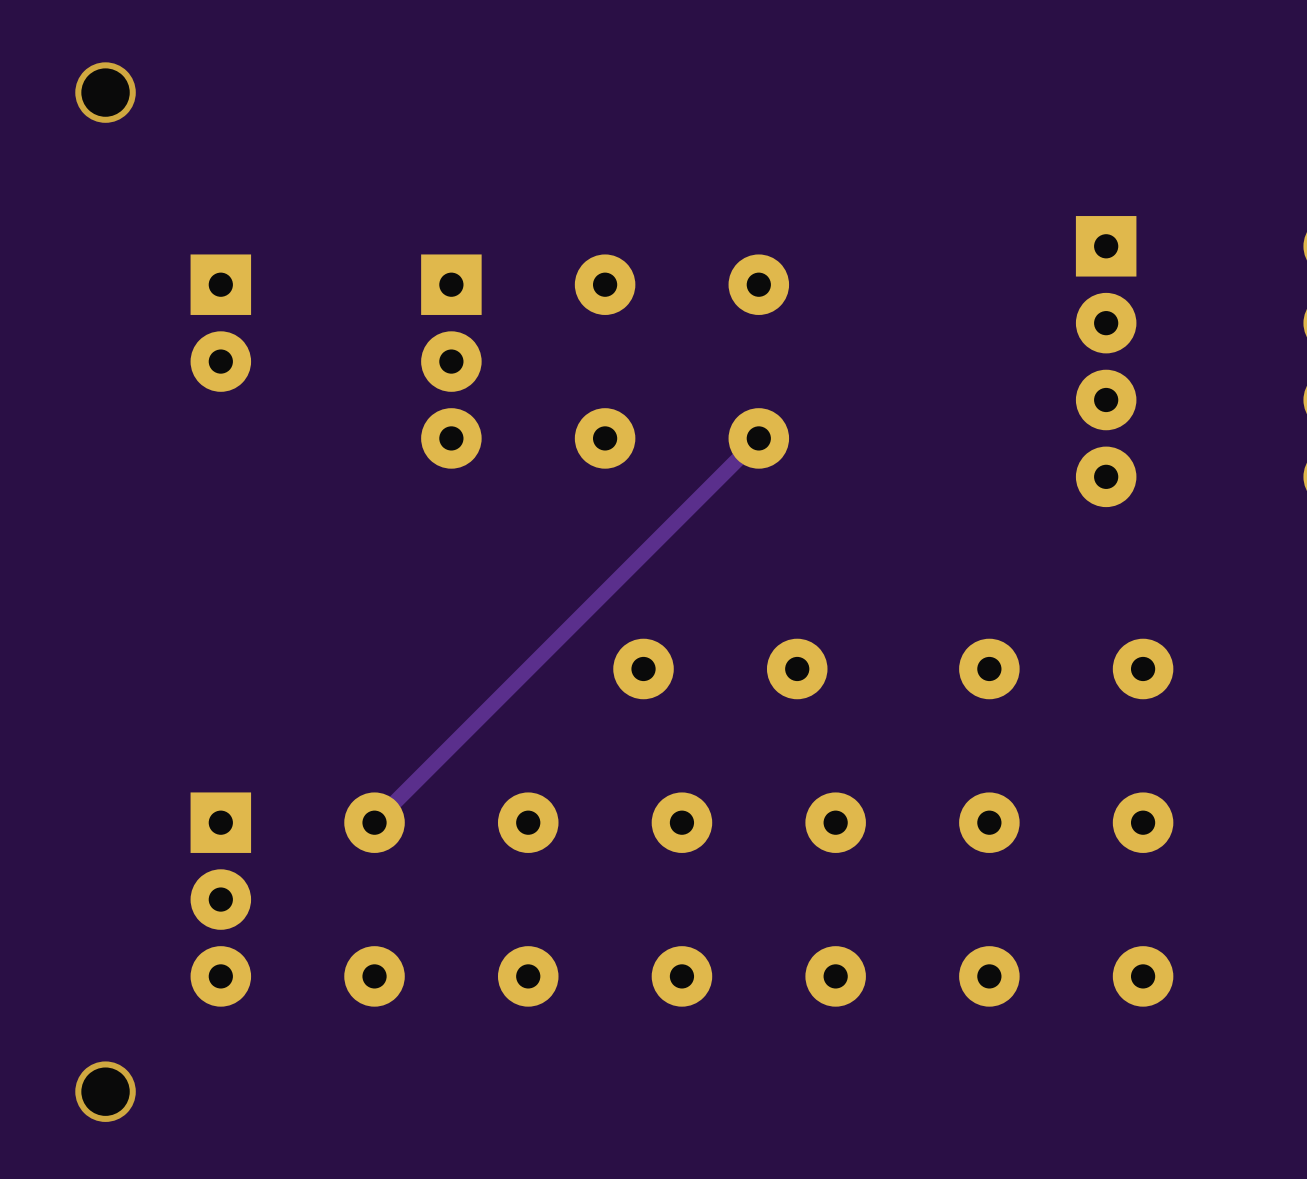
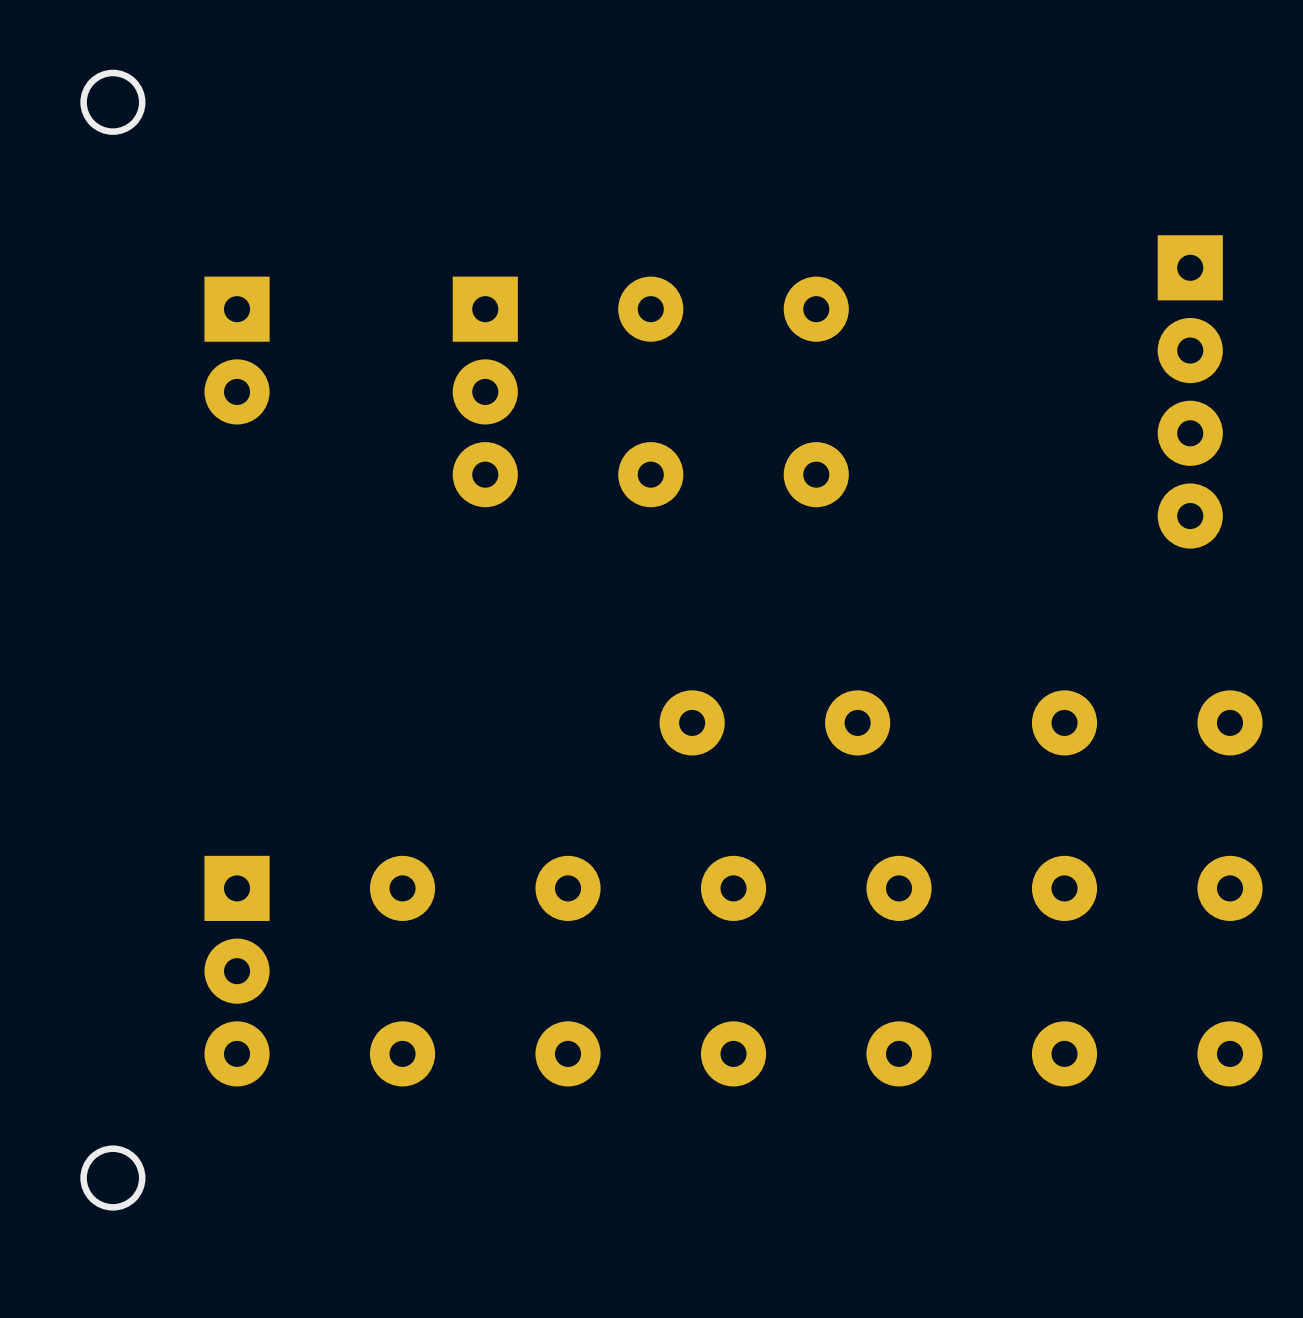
track: (758, 438) (374, 822) -> none

